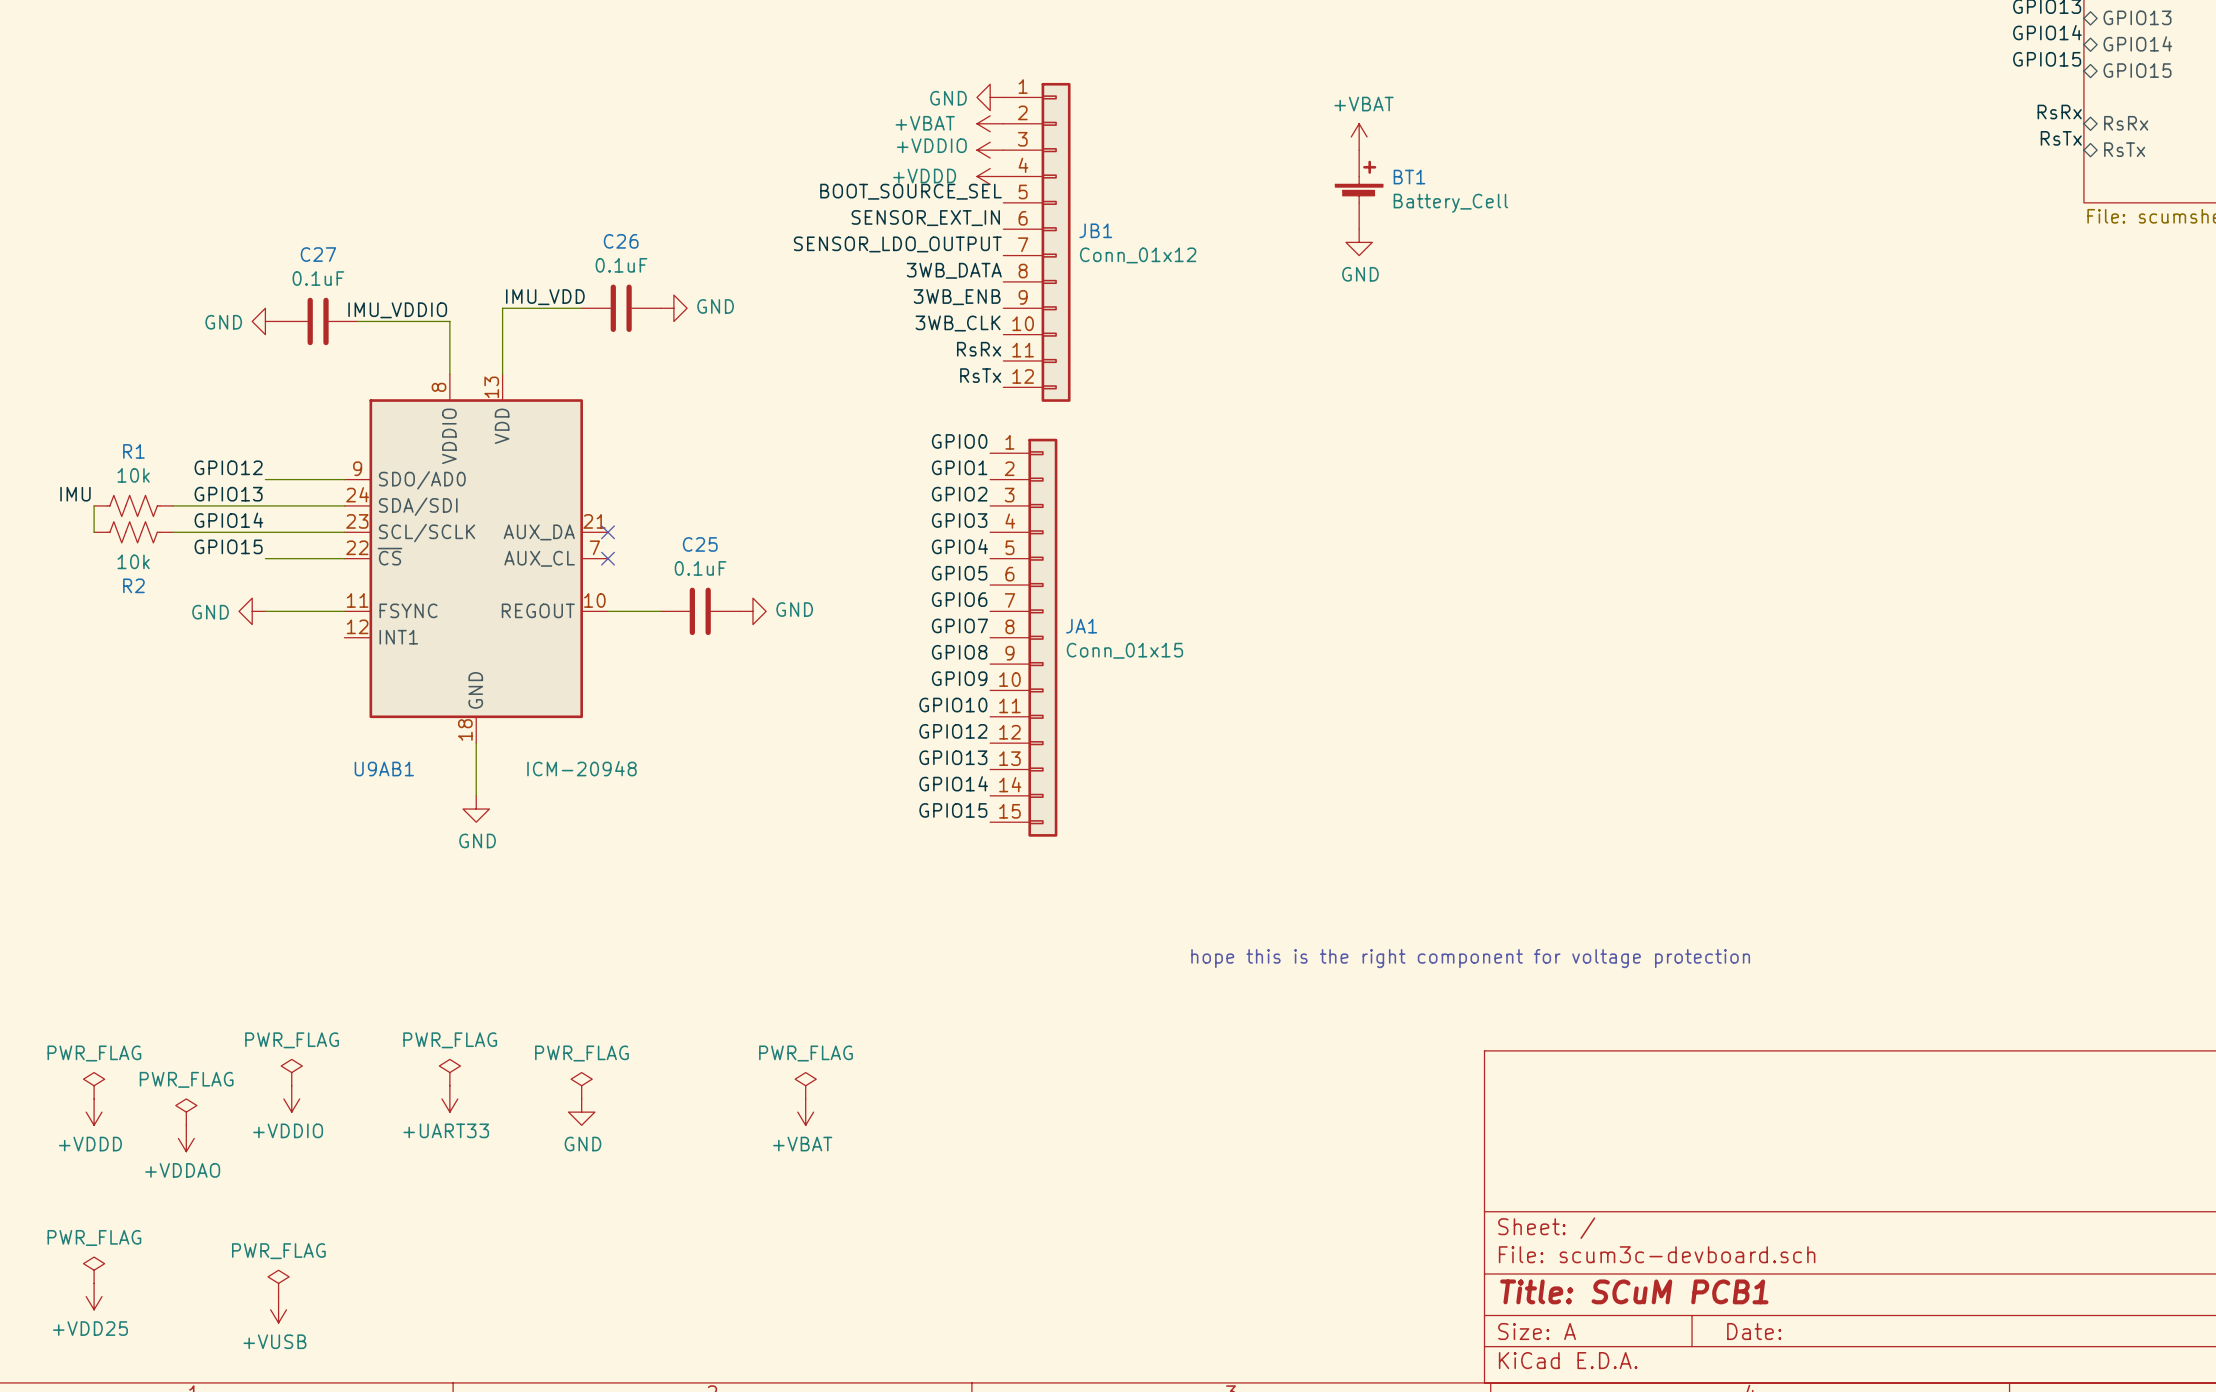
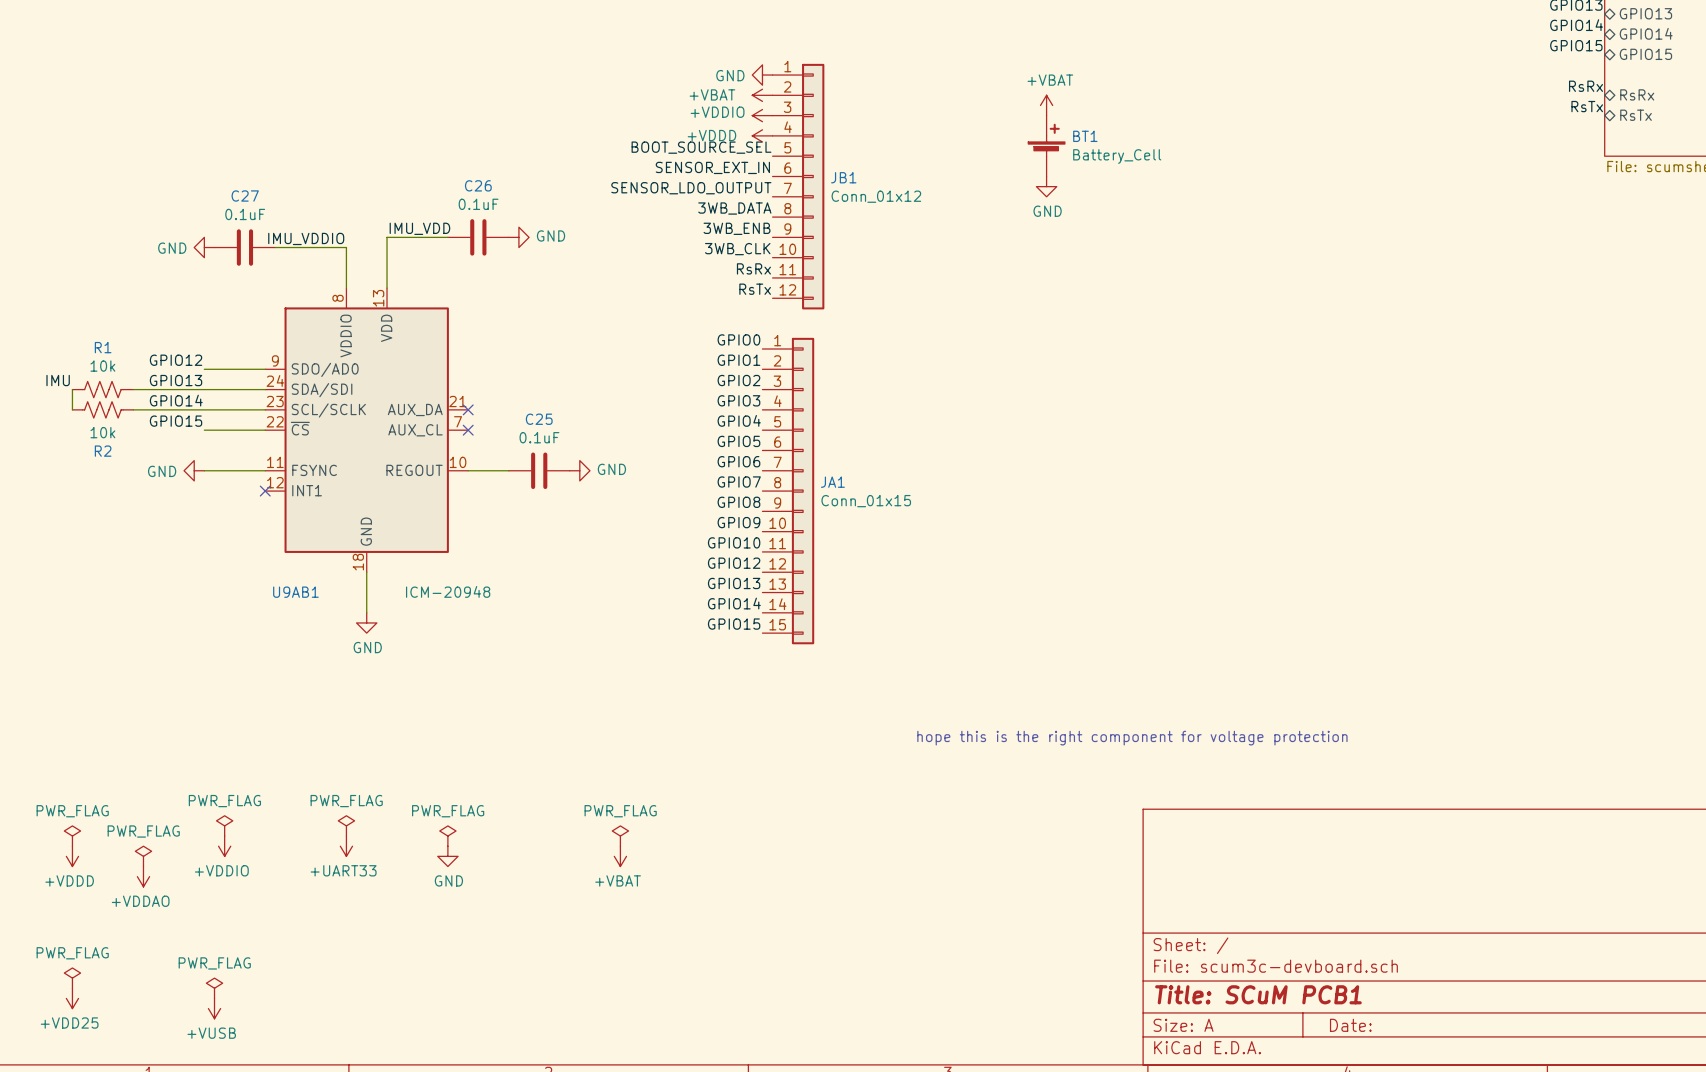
no-connect mark: none -> (265, 491)

